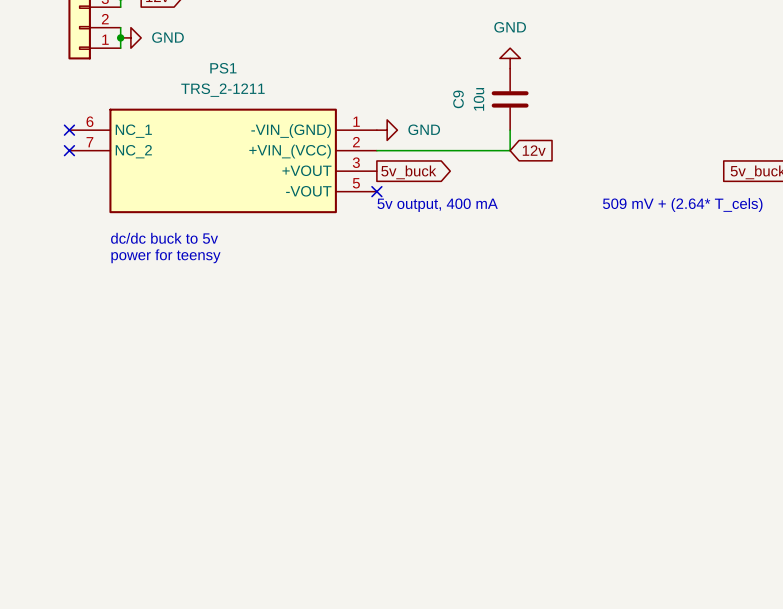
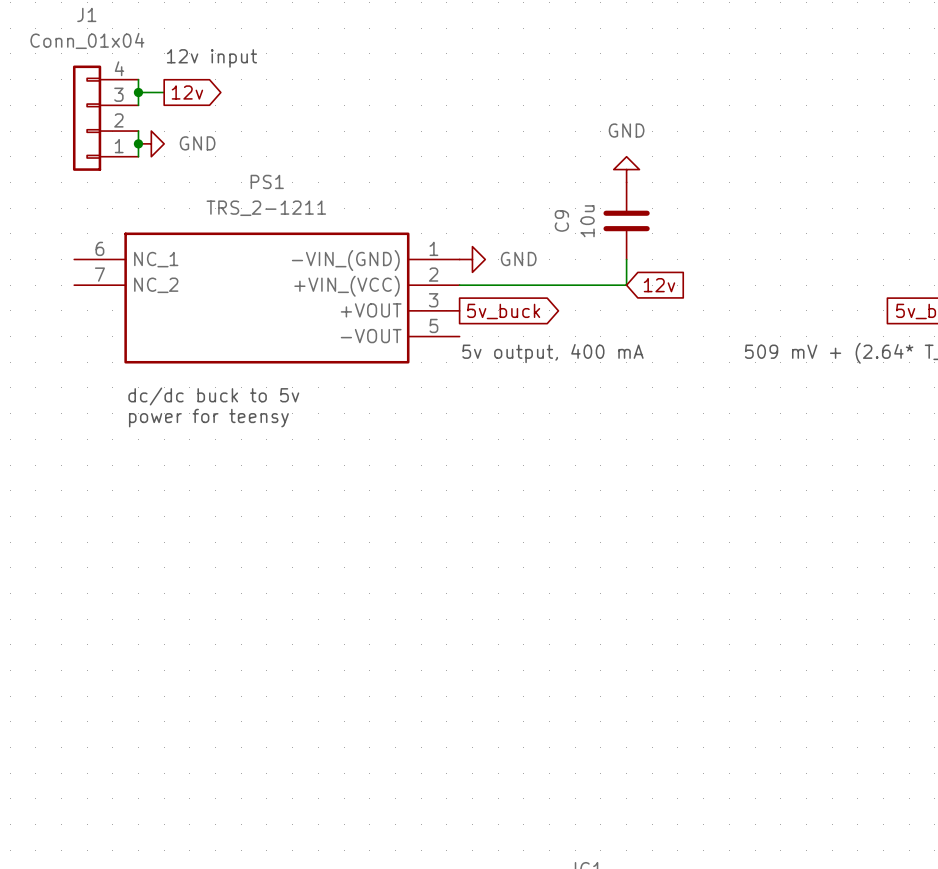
no-connect mark: (69, 130) -> none
no-connect mark: (69, 150) -> none
no-connect mark: (376, 191) -> none

